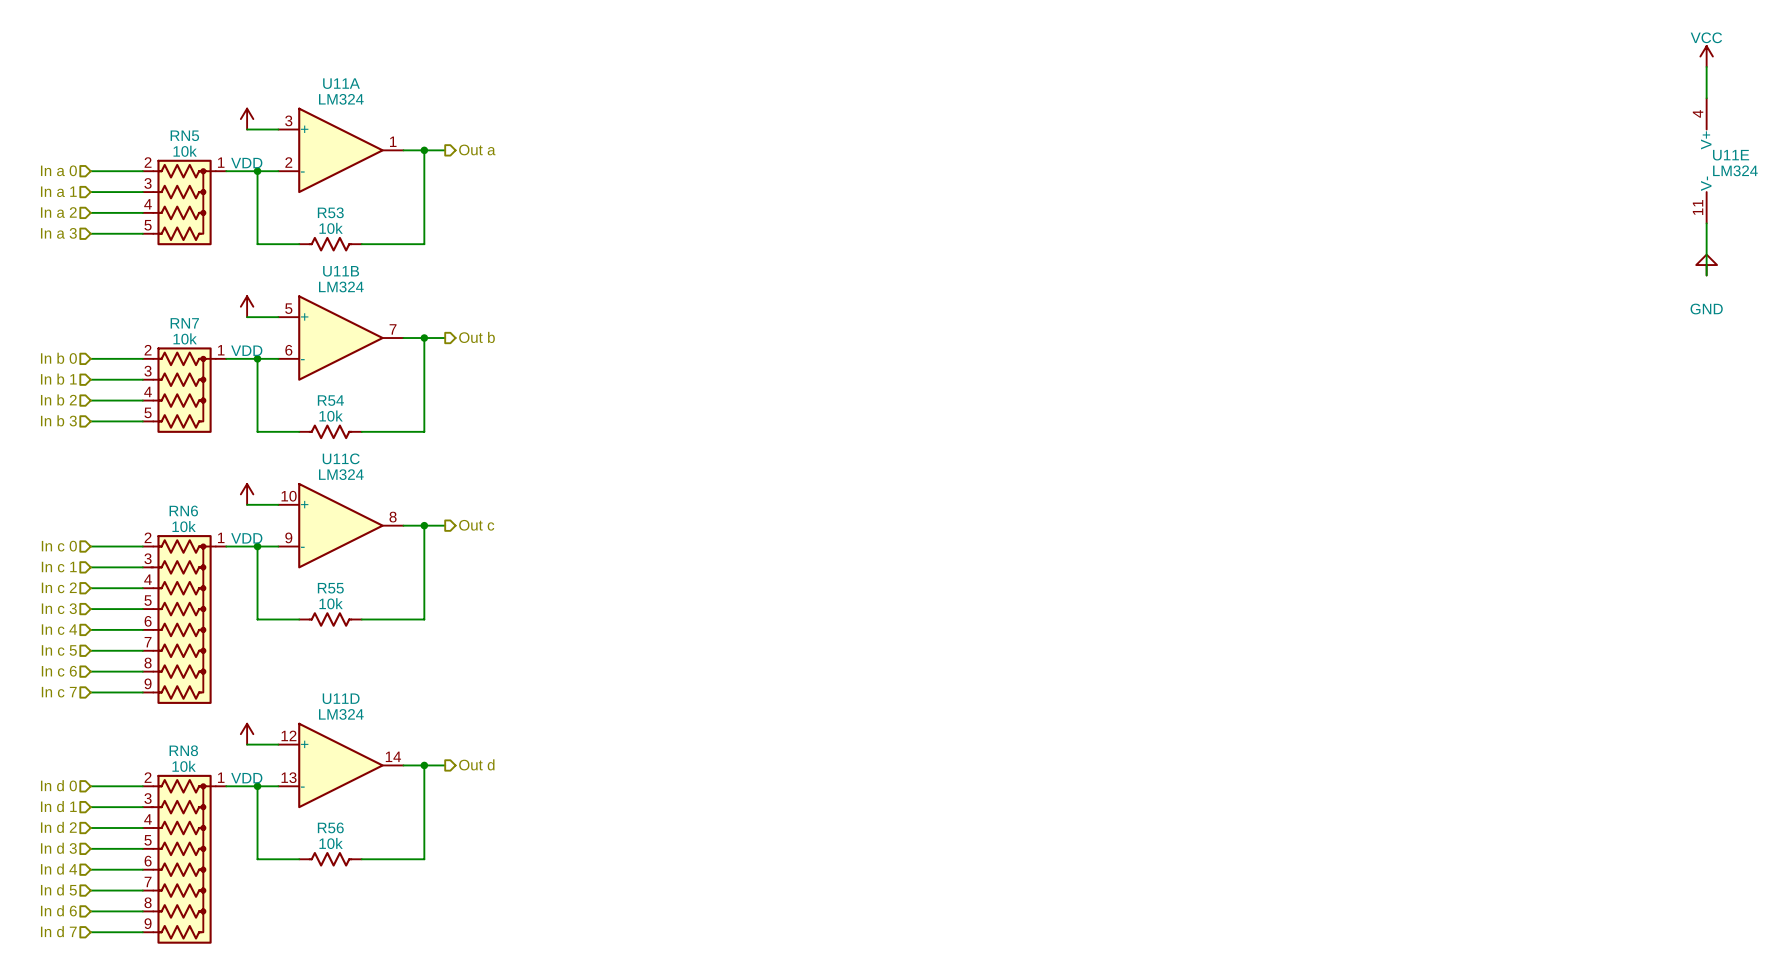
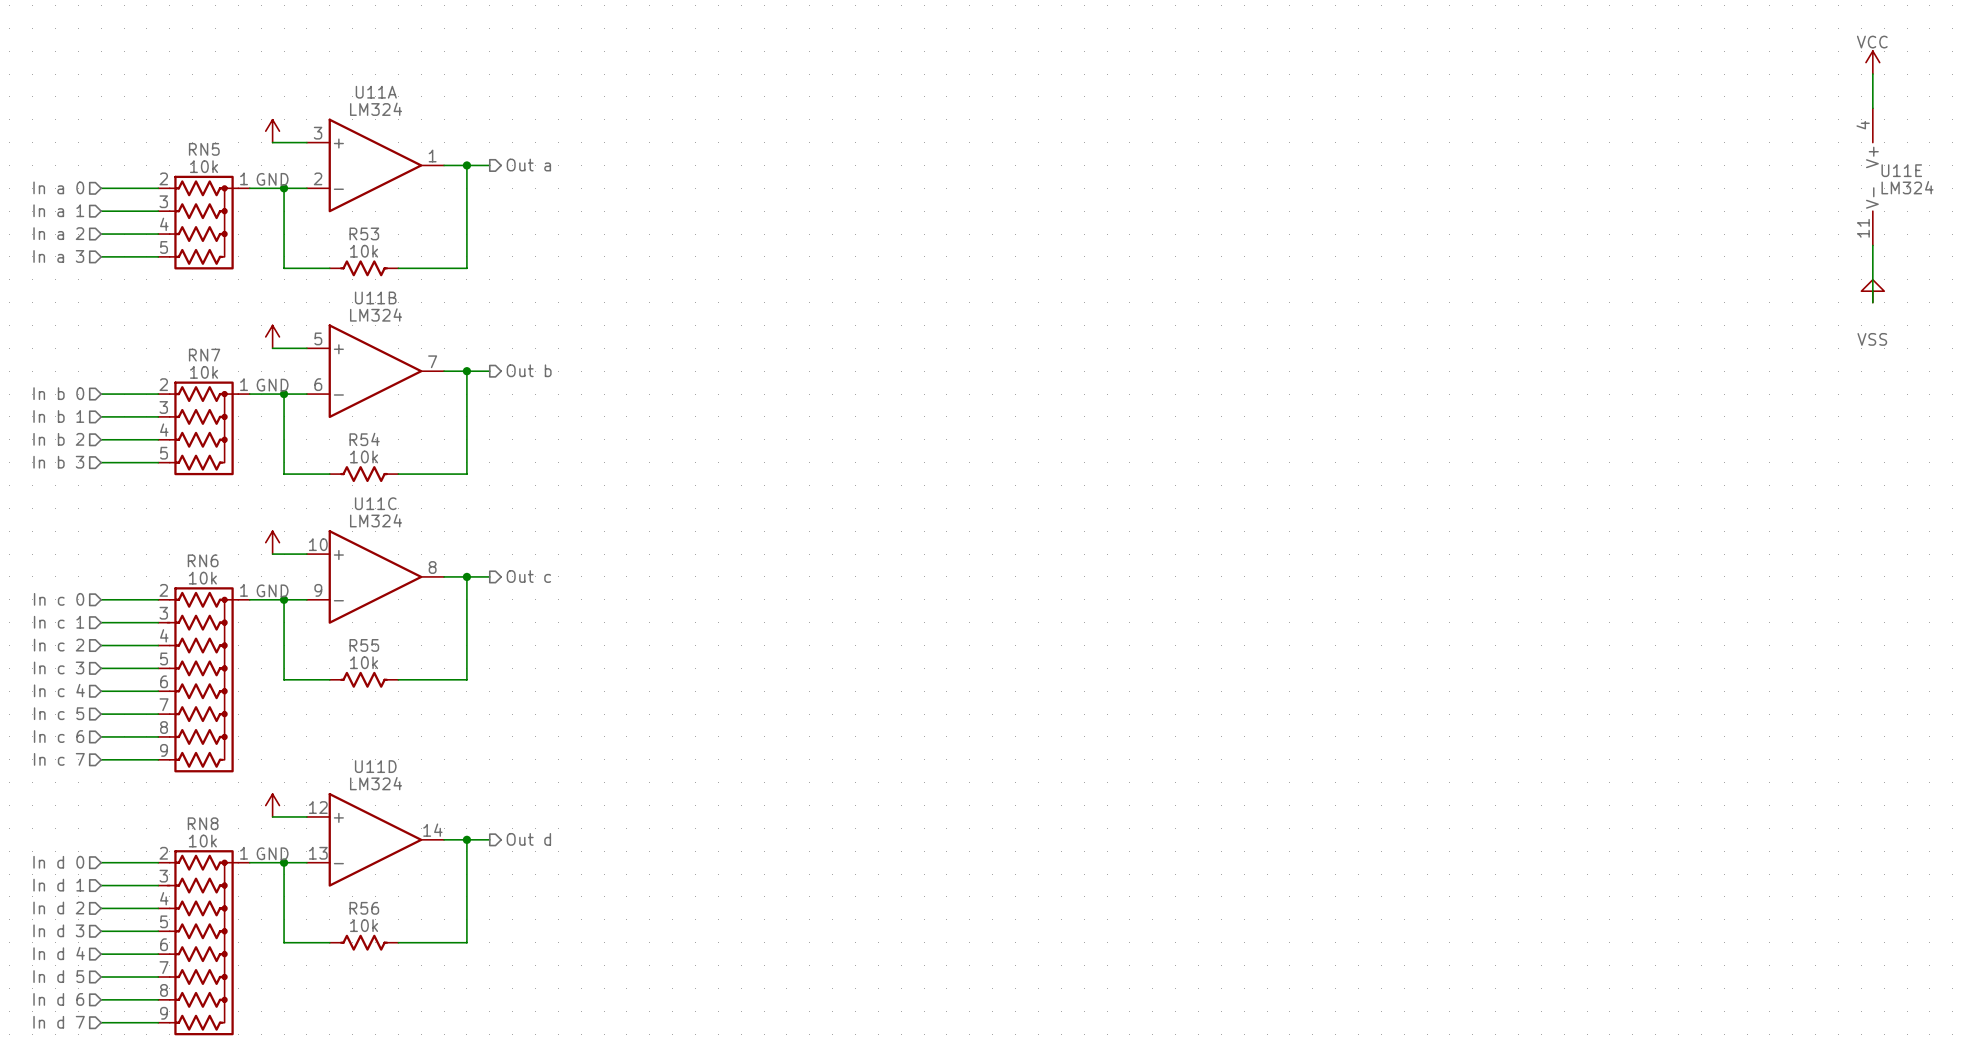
power symbol: VDD (247, 119) -> GND (272, 131)
power symbol: GND (1706, 265) -> VSS (1872, 291)
power symbol: VDD (247, 306) -> GND (272, 336)
power symbol: VDD (247, 494) -> GND (272, 542)
power symbol: VDD (247, 734) -> GND (272, 805)

